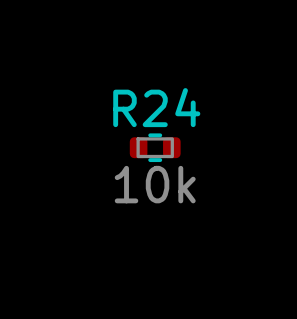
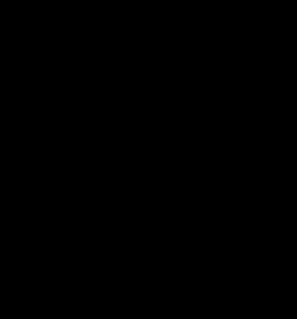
R24: 10k (155, 147) -> none

